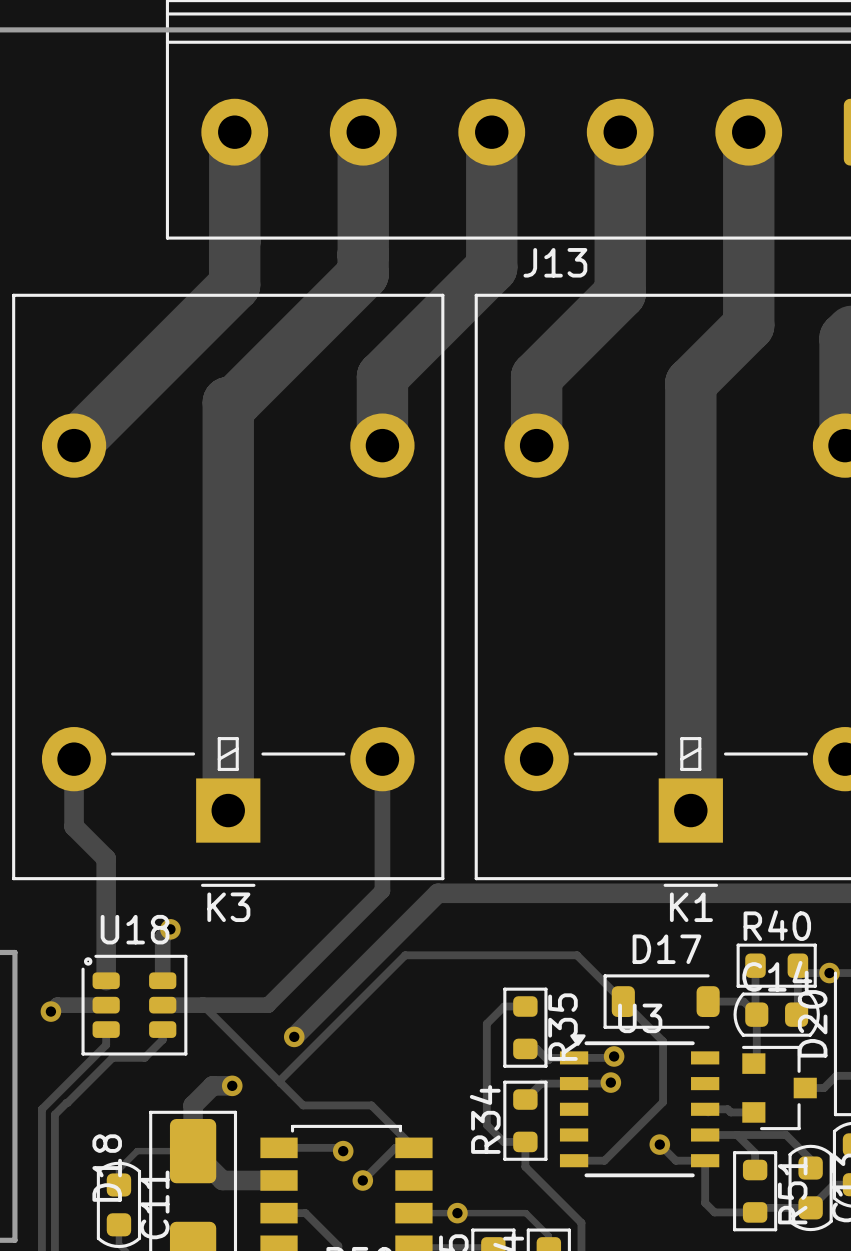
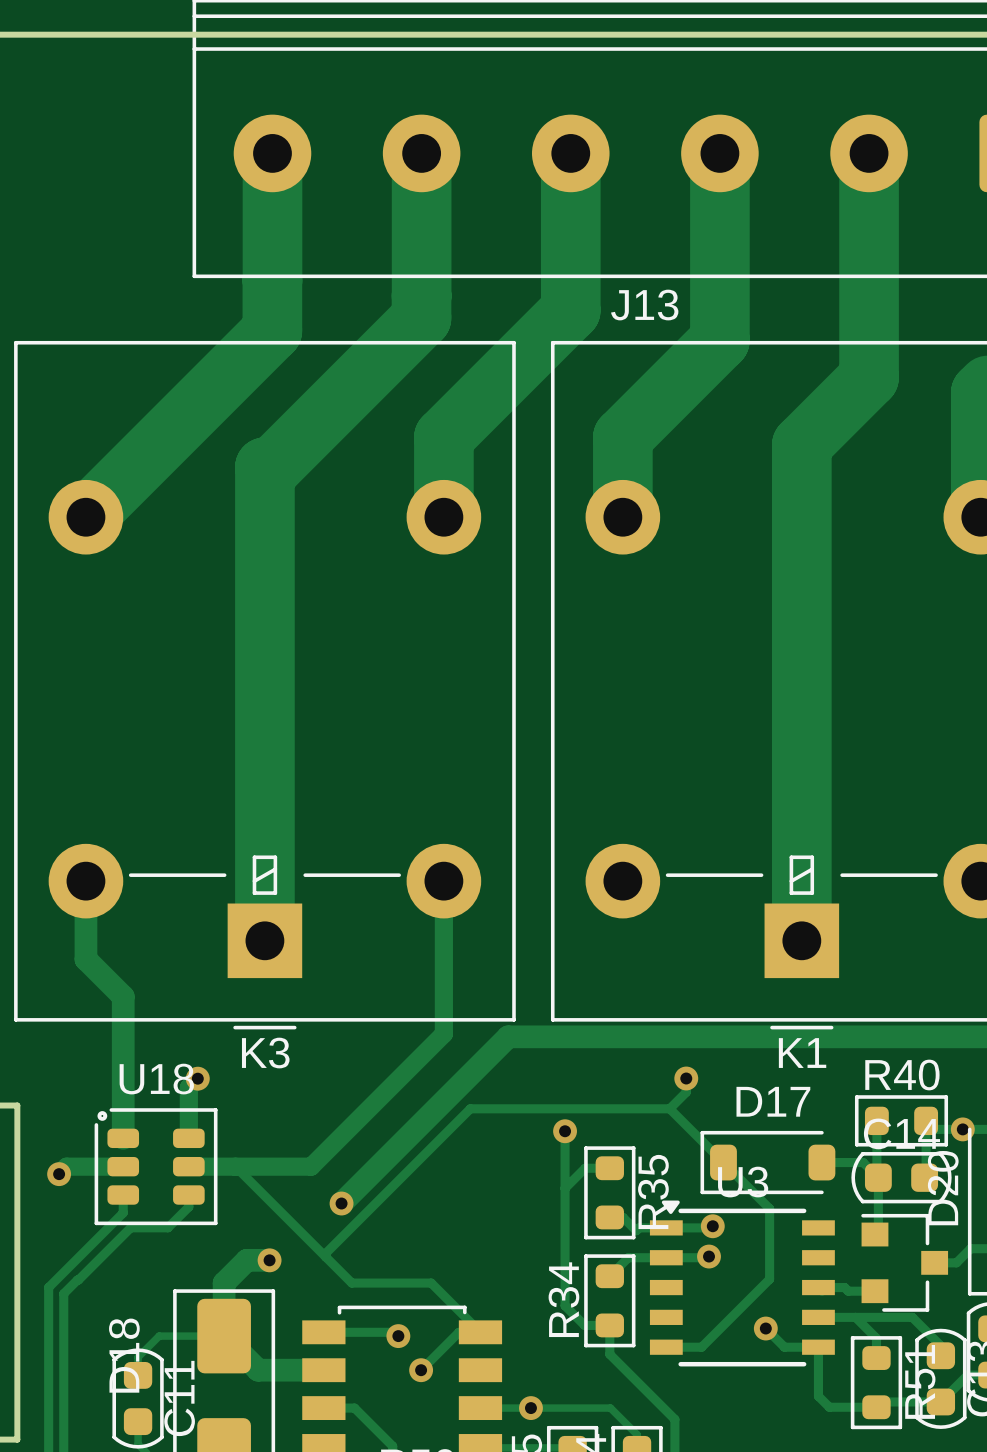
track: none -> (686, 1078) (686, 1092) (669, 1108)
via: none -> (686, 1078)
track: none -> (565, 1131) (565, 1188)
via: none -> (565, 1131)

